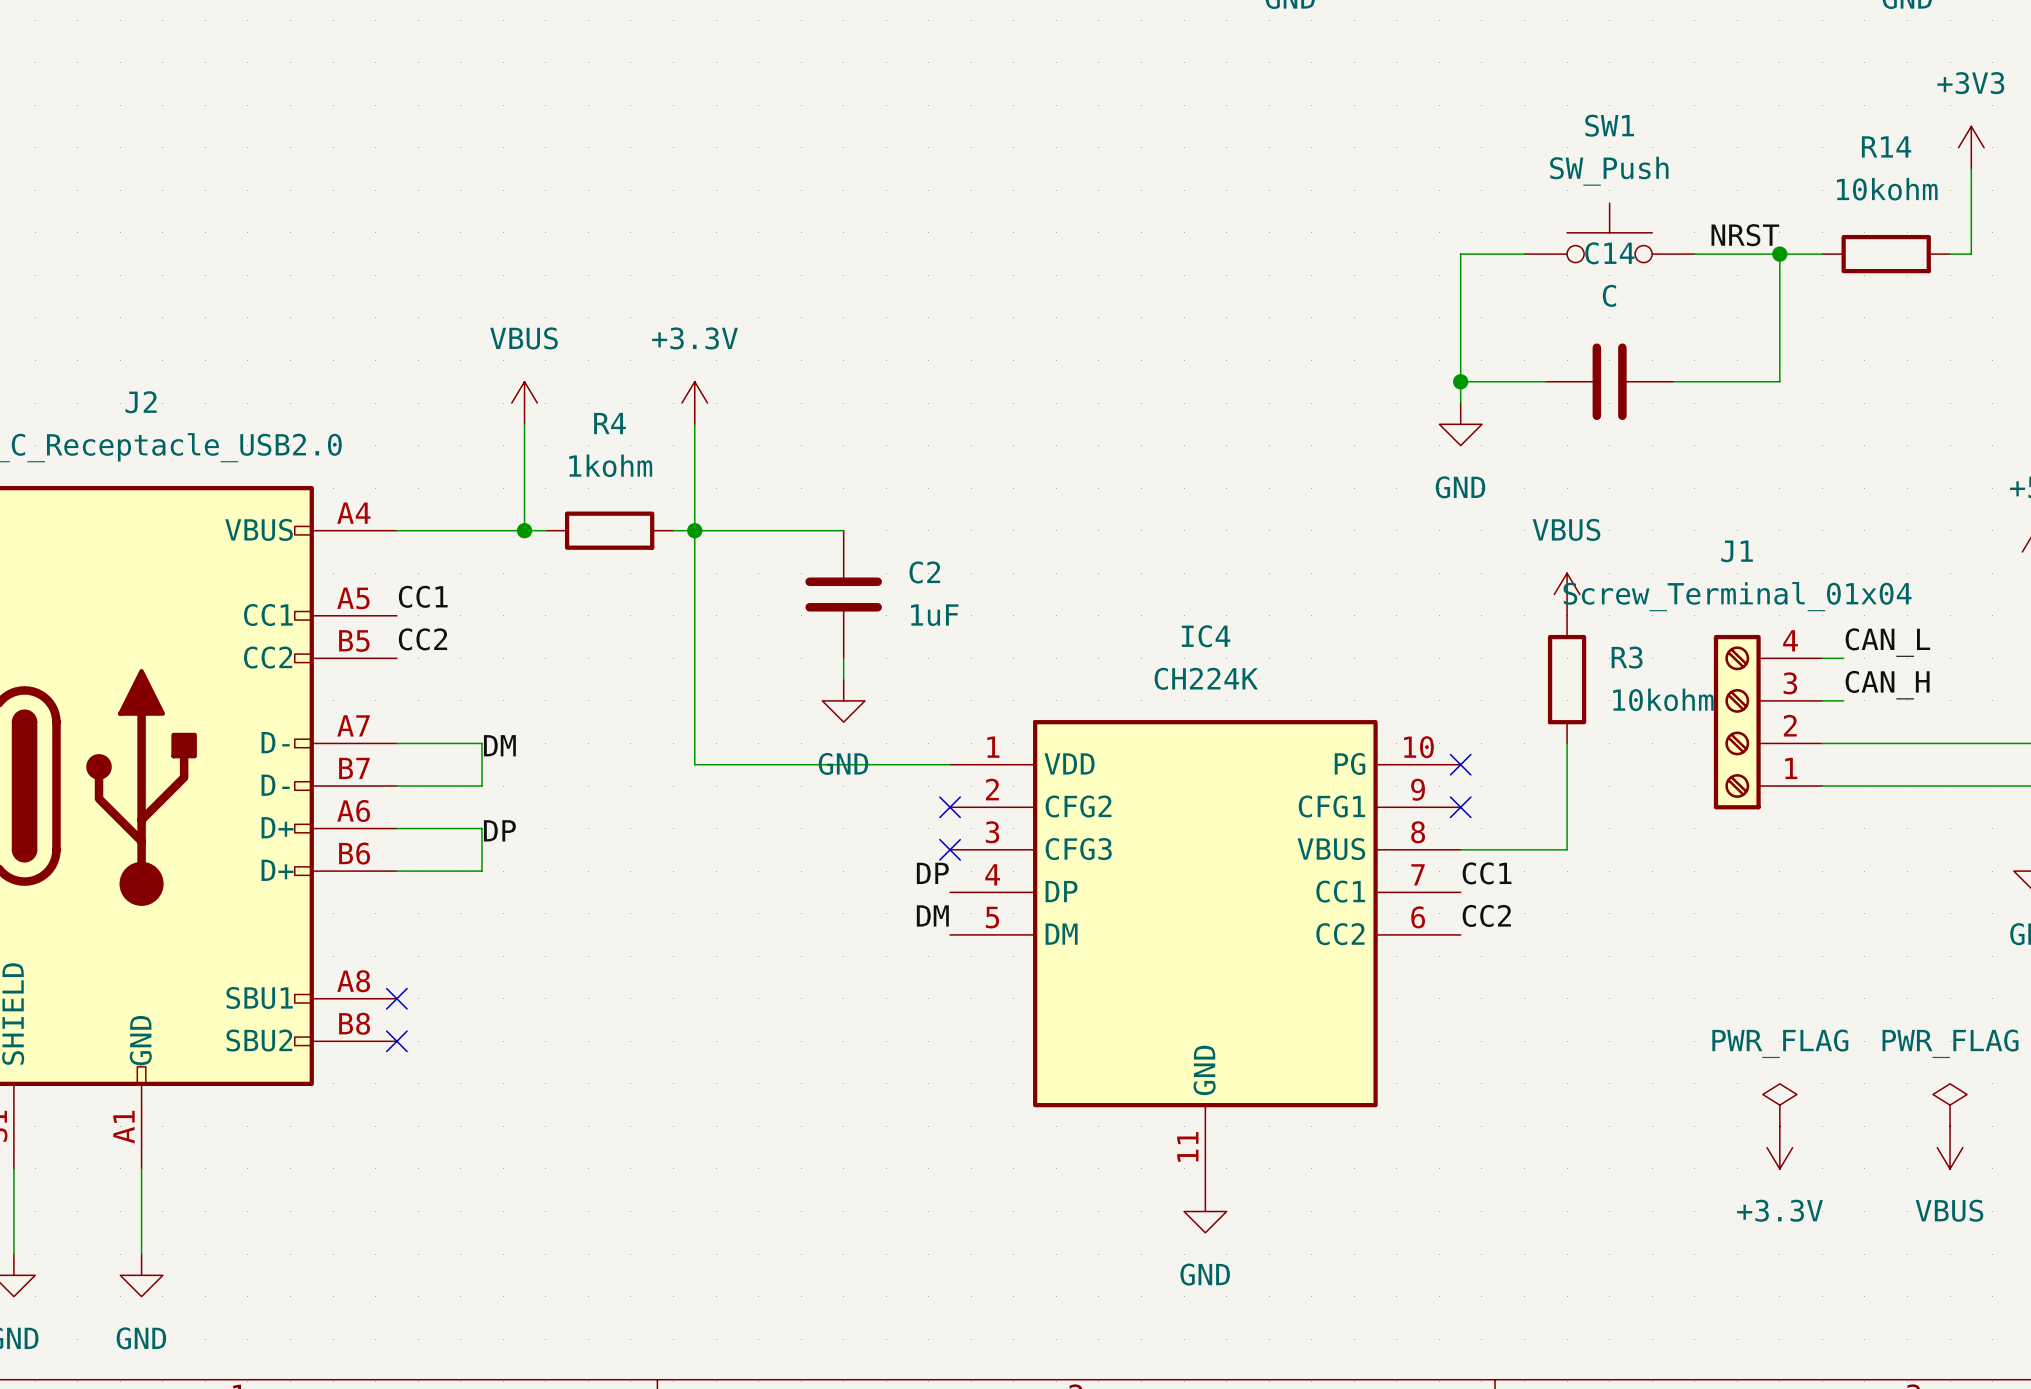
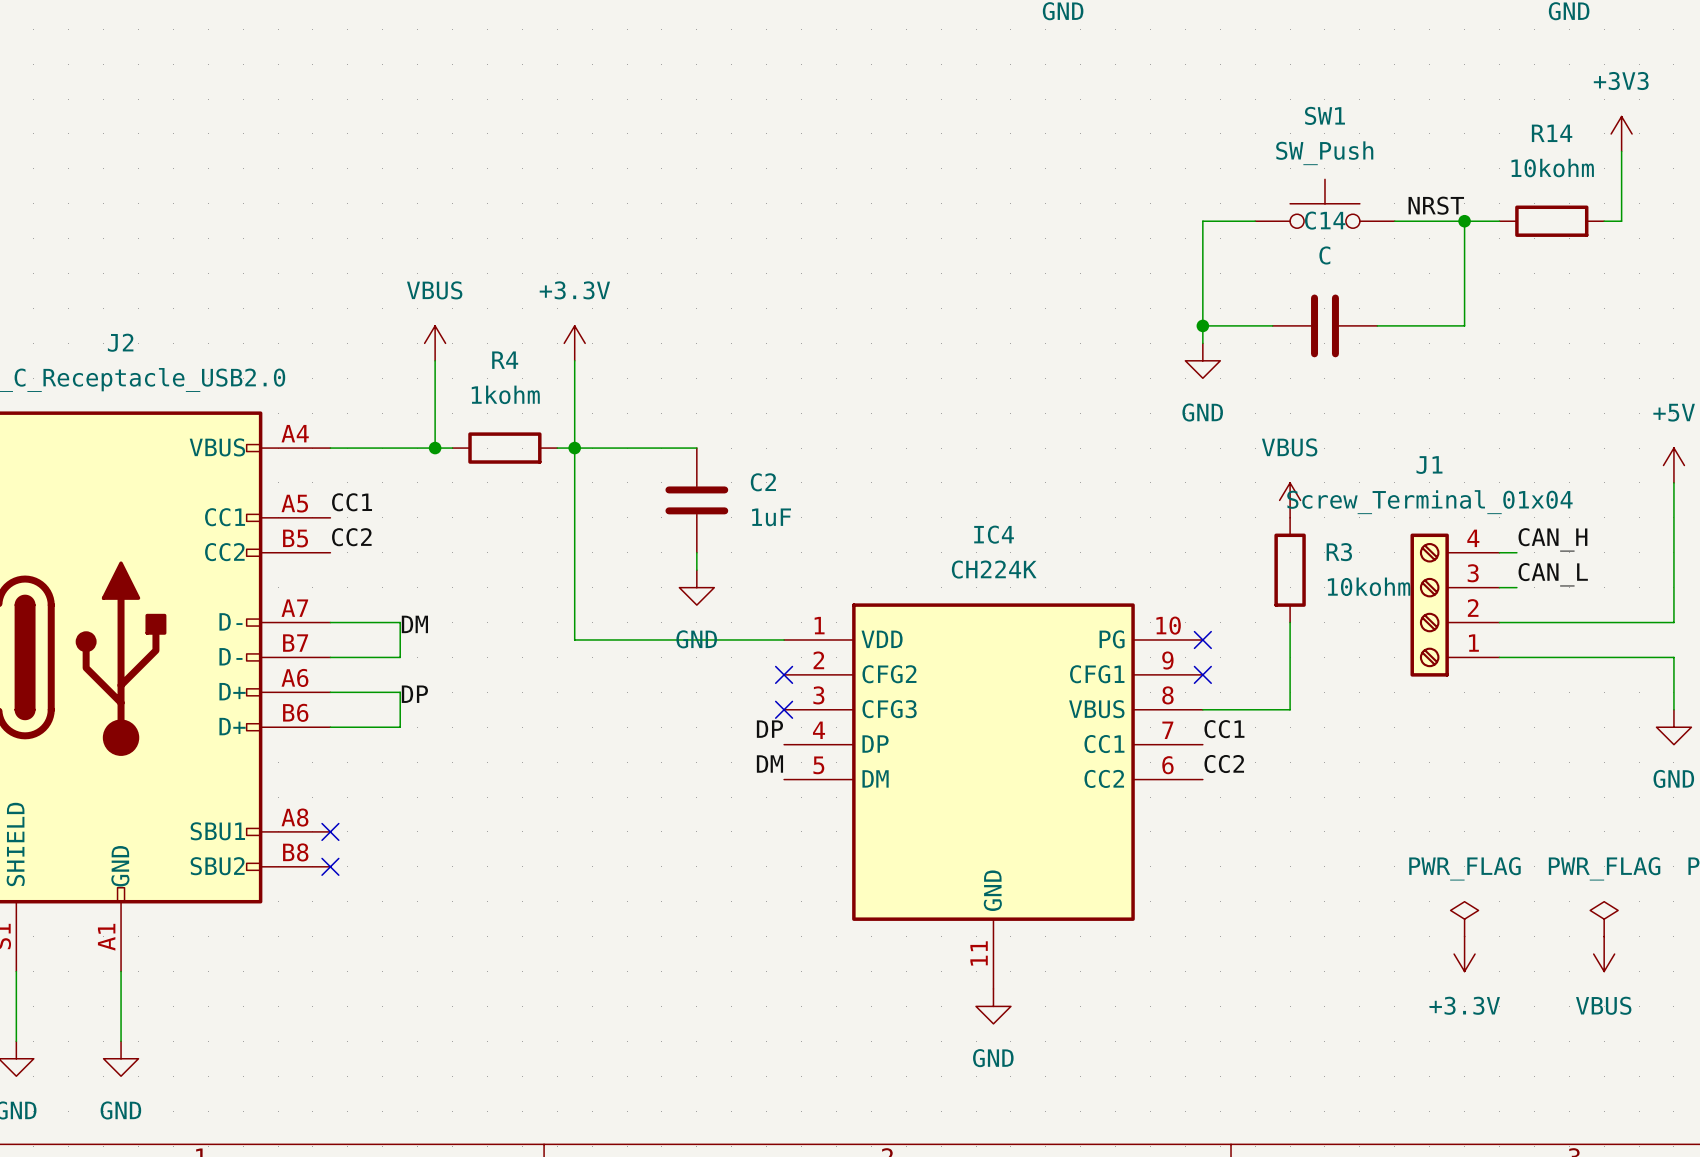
label: CAN_L (1887, 642) -> CAN_H (1552, 539)
label: CAN_H (1887, 685) -> CAN_L (1553, 574)

